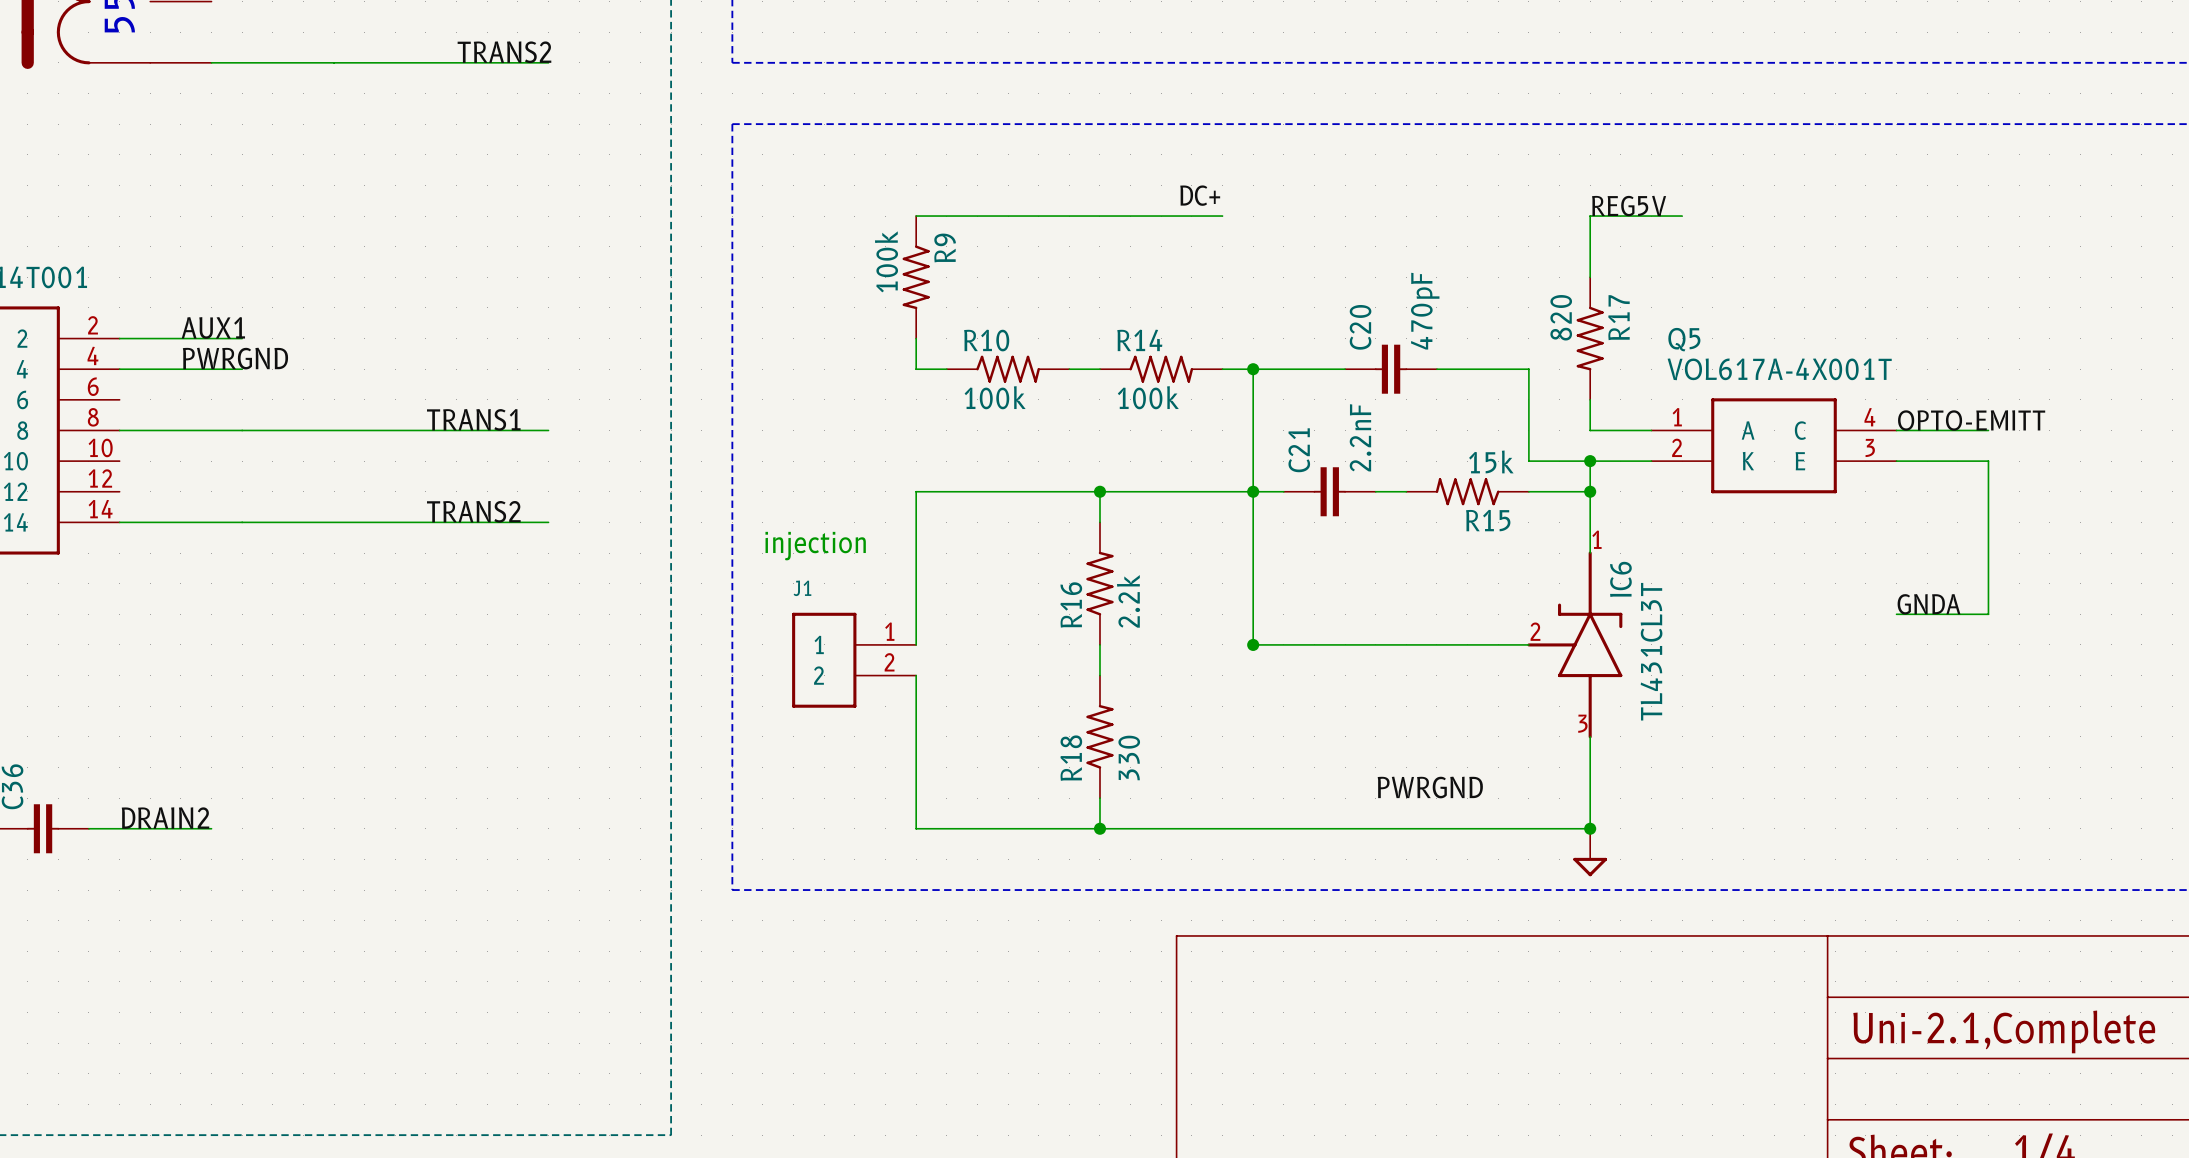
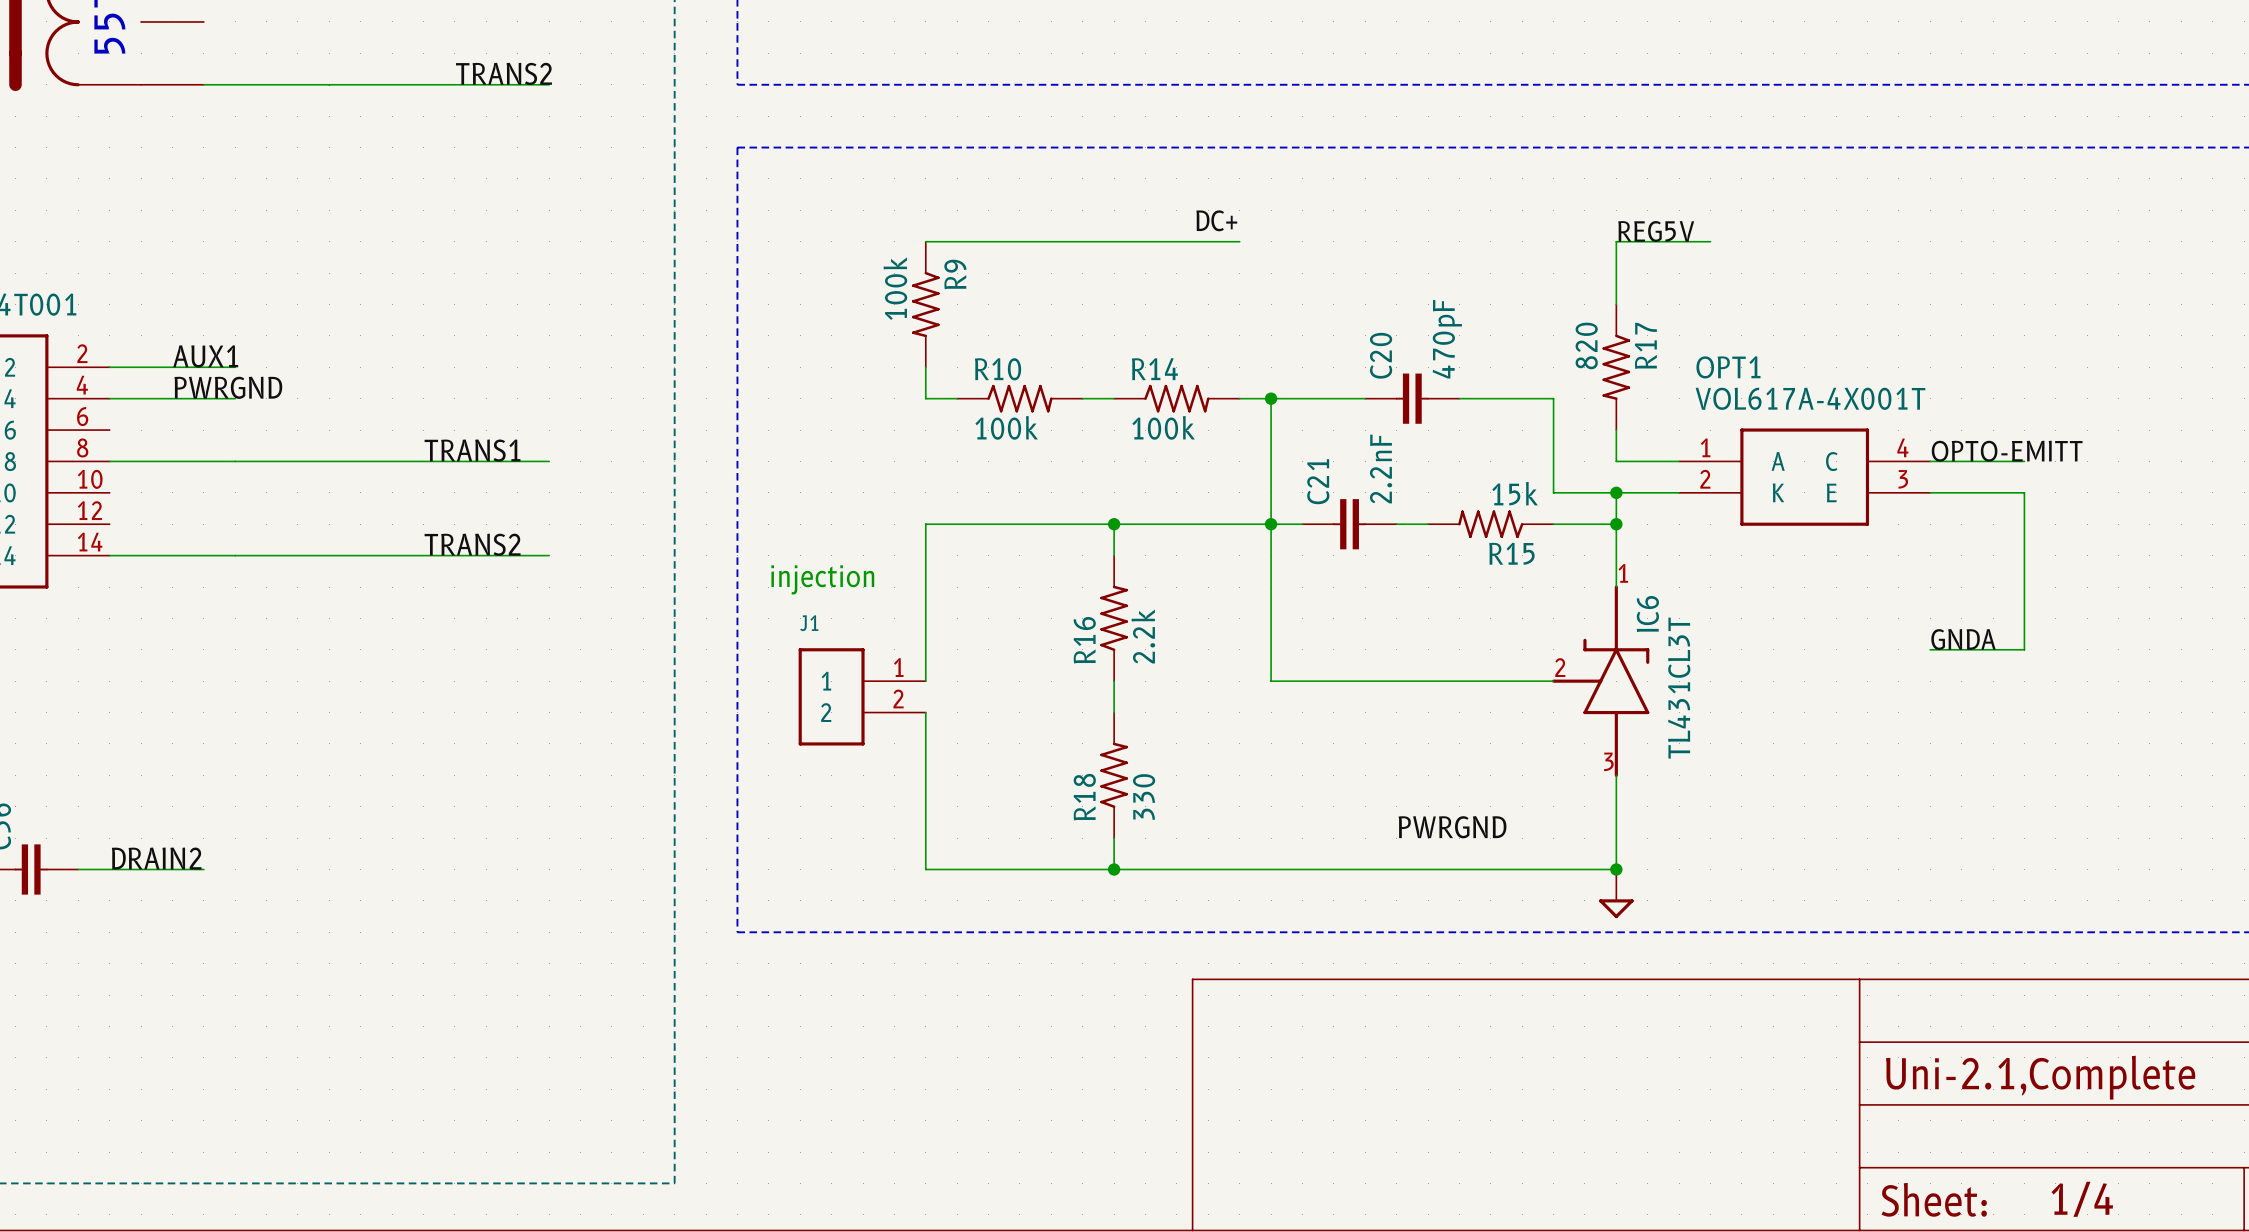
Q5 name: Q5 (1684, 339) -> OPT1 (1728, 367)
junction: (1253, 644) -> none

